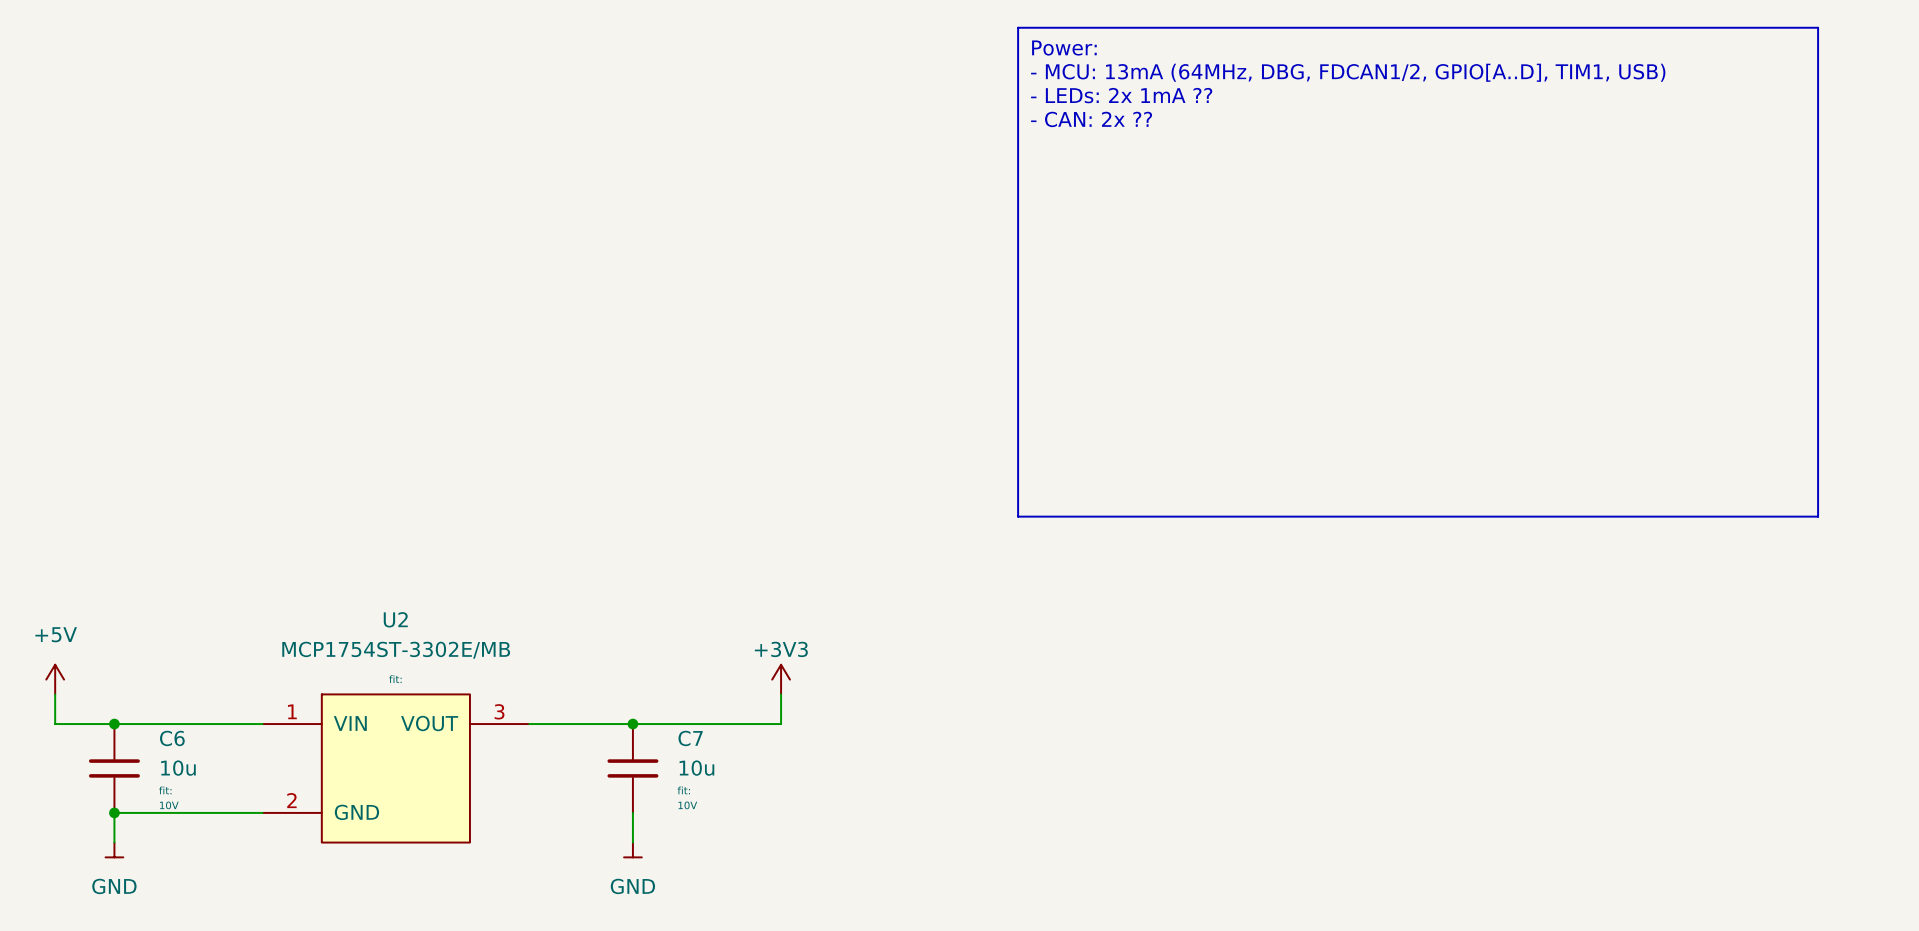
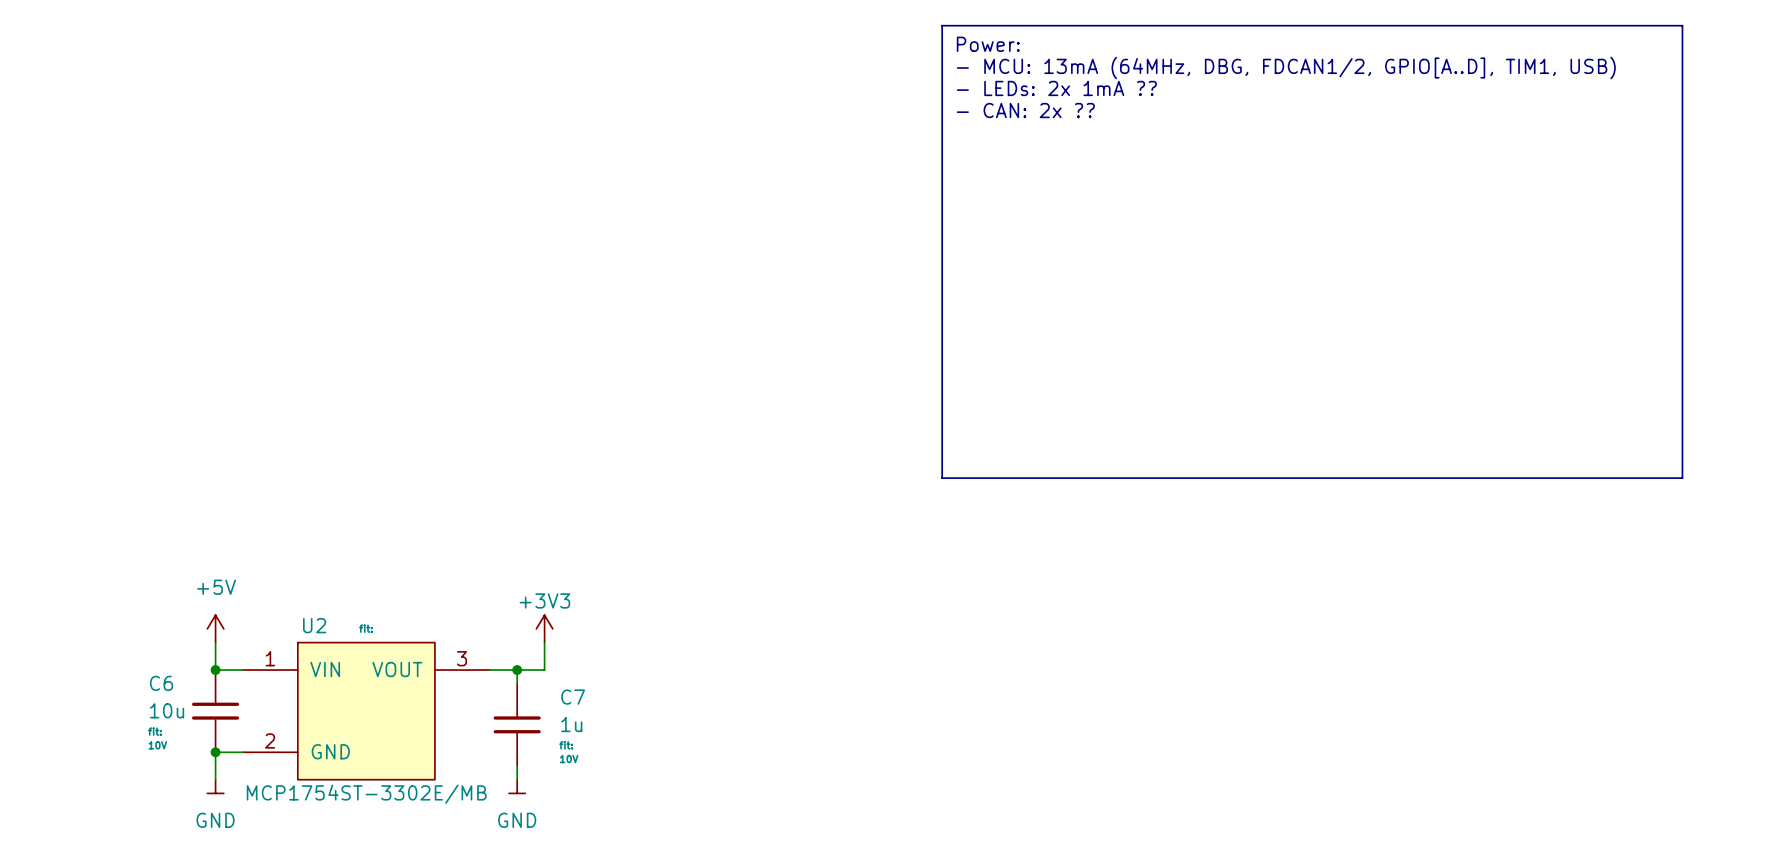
U2 name position: U2 (395, 619) -> U2 (314, 625)
U2 value position: MCP1754ST-3302E/MB (396, 650) -> MCP1754ST-3302E/MB (366, 794)
power symbol position: +5V (55, 679) -> +5V (215, 628)
power symbol position: +3V3 (781, 679) -> +3V3 (544, 628)
wire: (55, 694) (55, 724) (232, 724) -> (215, 642) (215, 670)
wire: (781, 694) (781, 724) (588, 724) -> (544, 642) (544, 670)
junction: (114, 724) -> none
junction: none -> (215, 670)
wire: none -> (517, 670) (517, 683)
junction: none -> (517, 670)
junction: (632, 724) -> none
C6 position: (114, 768) -> (215, 711)
C7 position: (632, 768) -> (517, 724)
C7 text: 10u (696, 768) -> 1u (571, 724)
junction: (114, 812) -> none
wire: (232, 812) (114, 812) (114, 842) -> (215, 752) (215, 779)
junction: none -> (215, 752)
wire: (632, 812) (632, 842) -> none
wire: none -> (517, 766) (517, 779)
power symbol position: GND (114, 849) -> GND (215, 786)
power symbol position: GND (632, 849) -> GND (517, 786)

